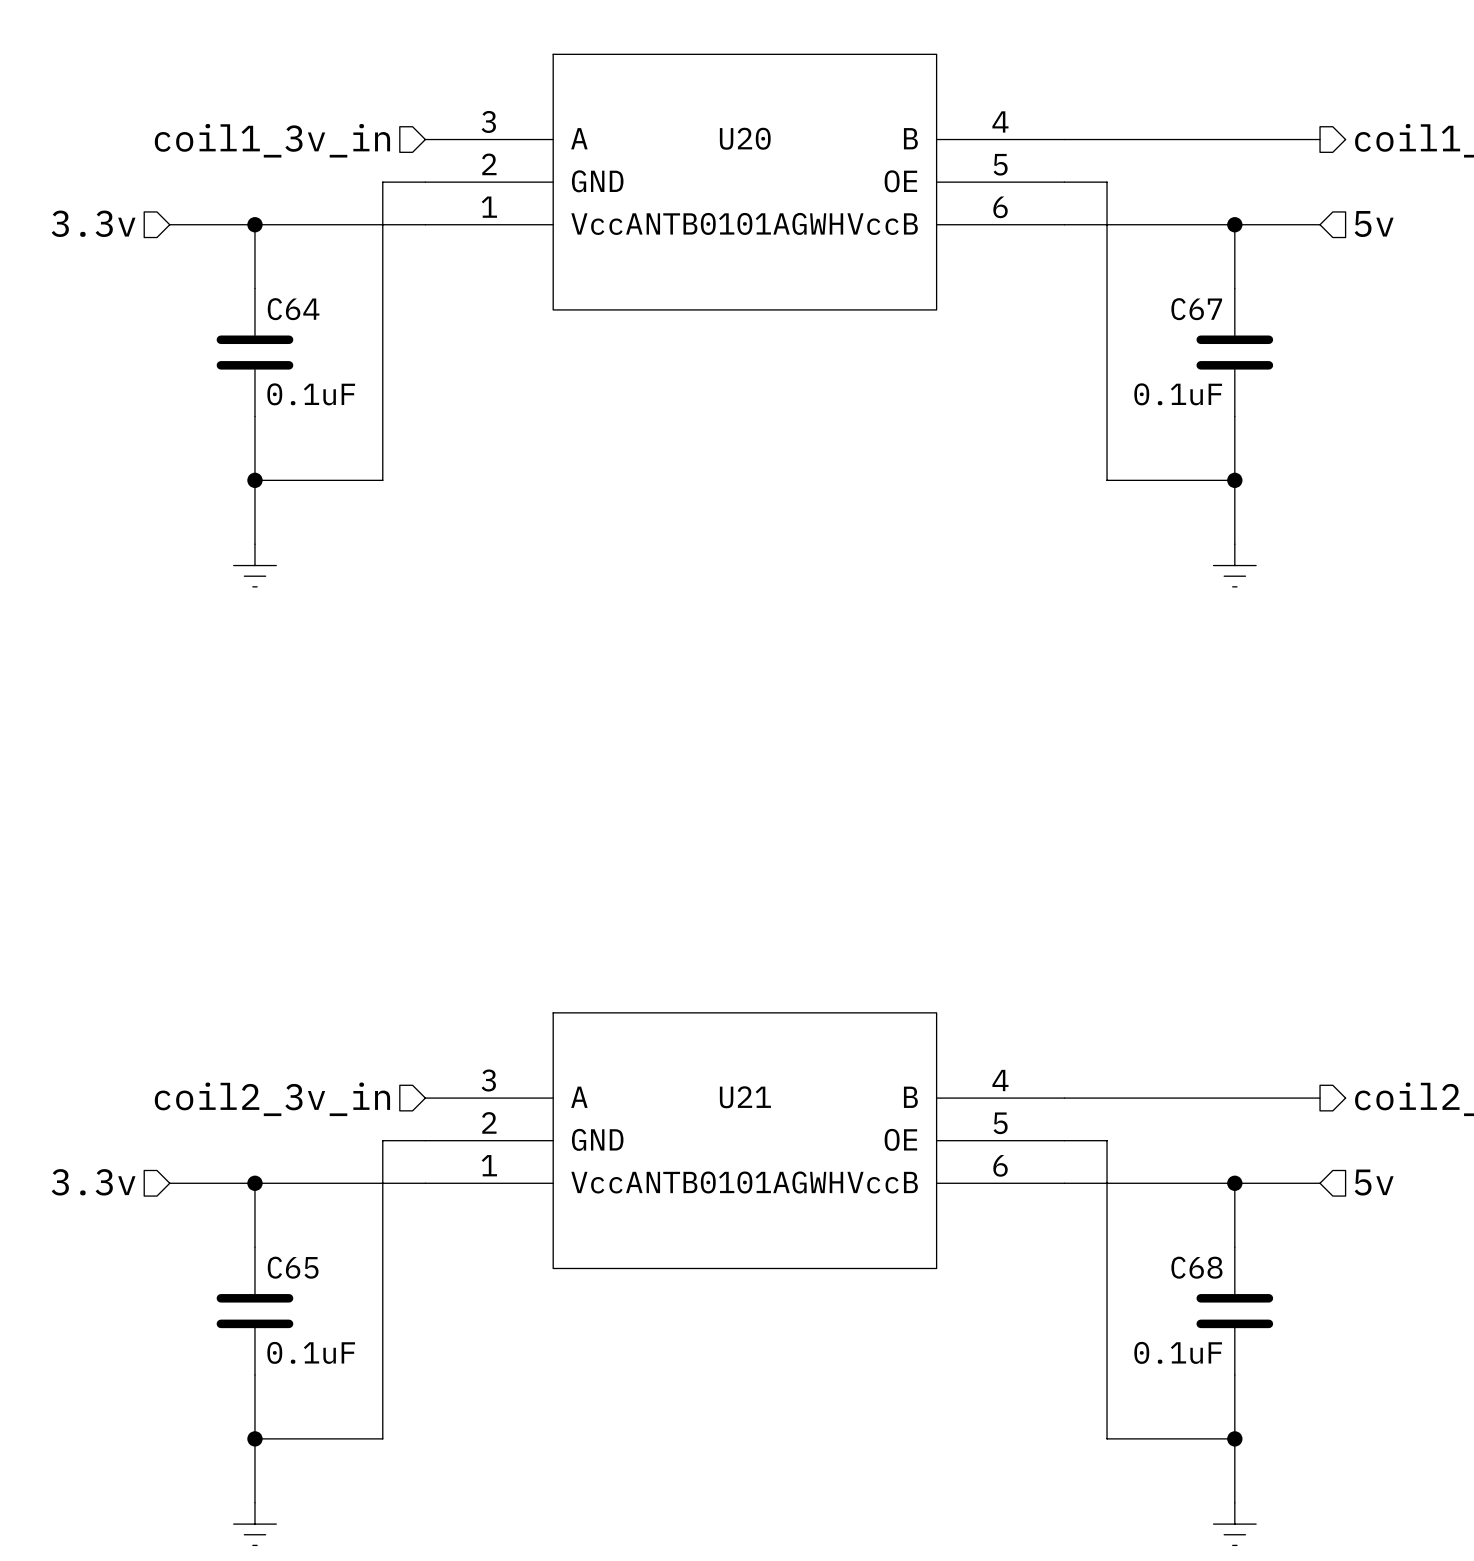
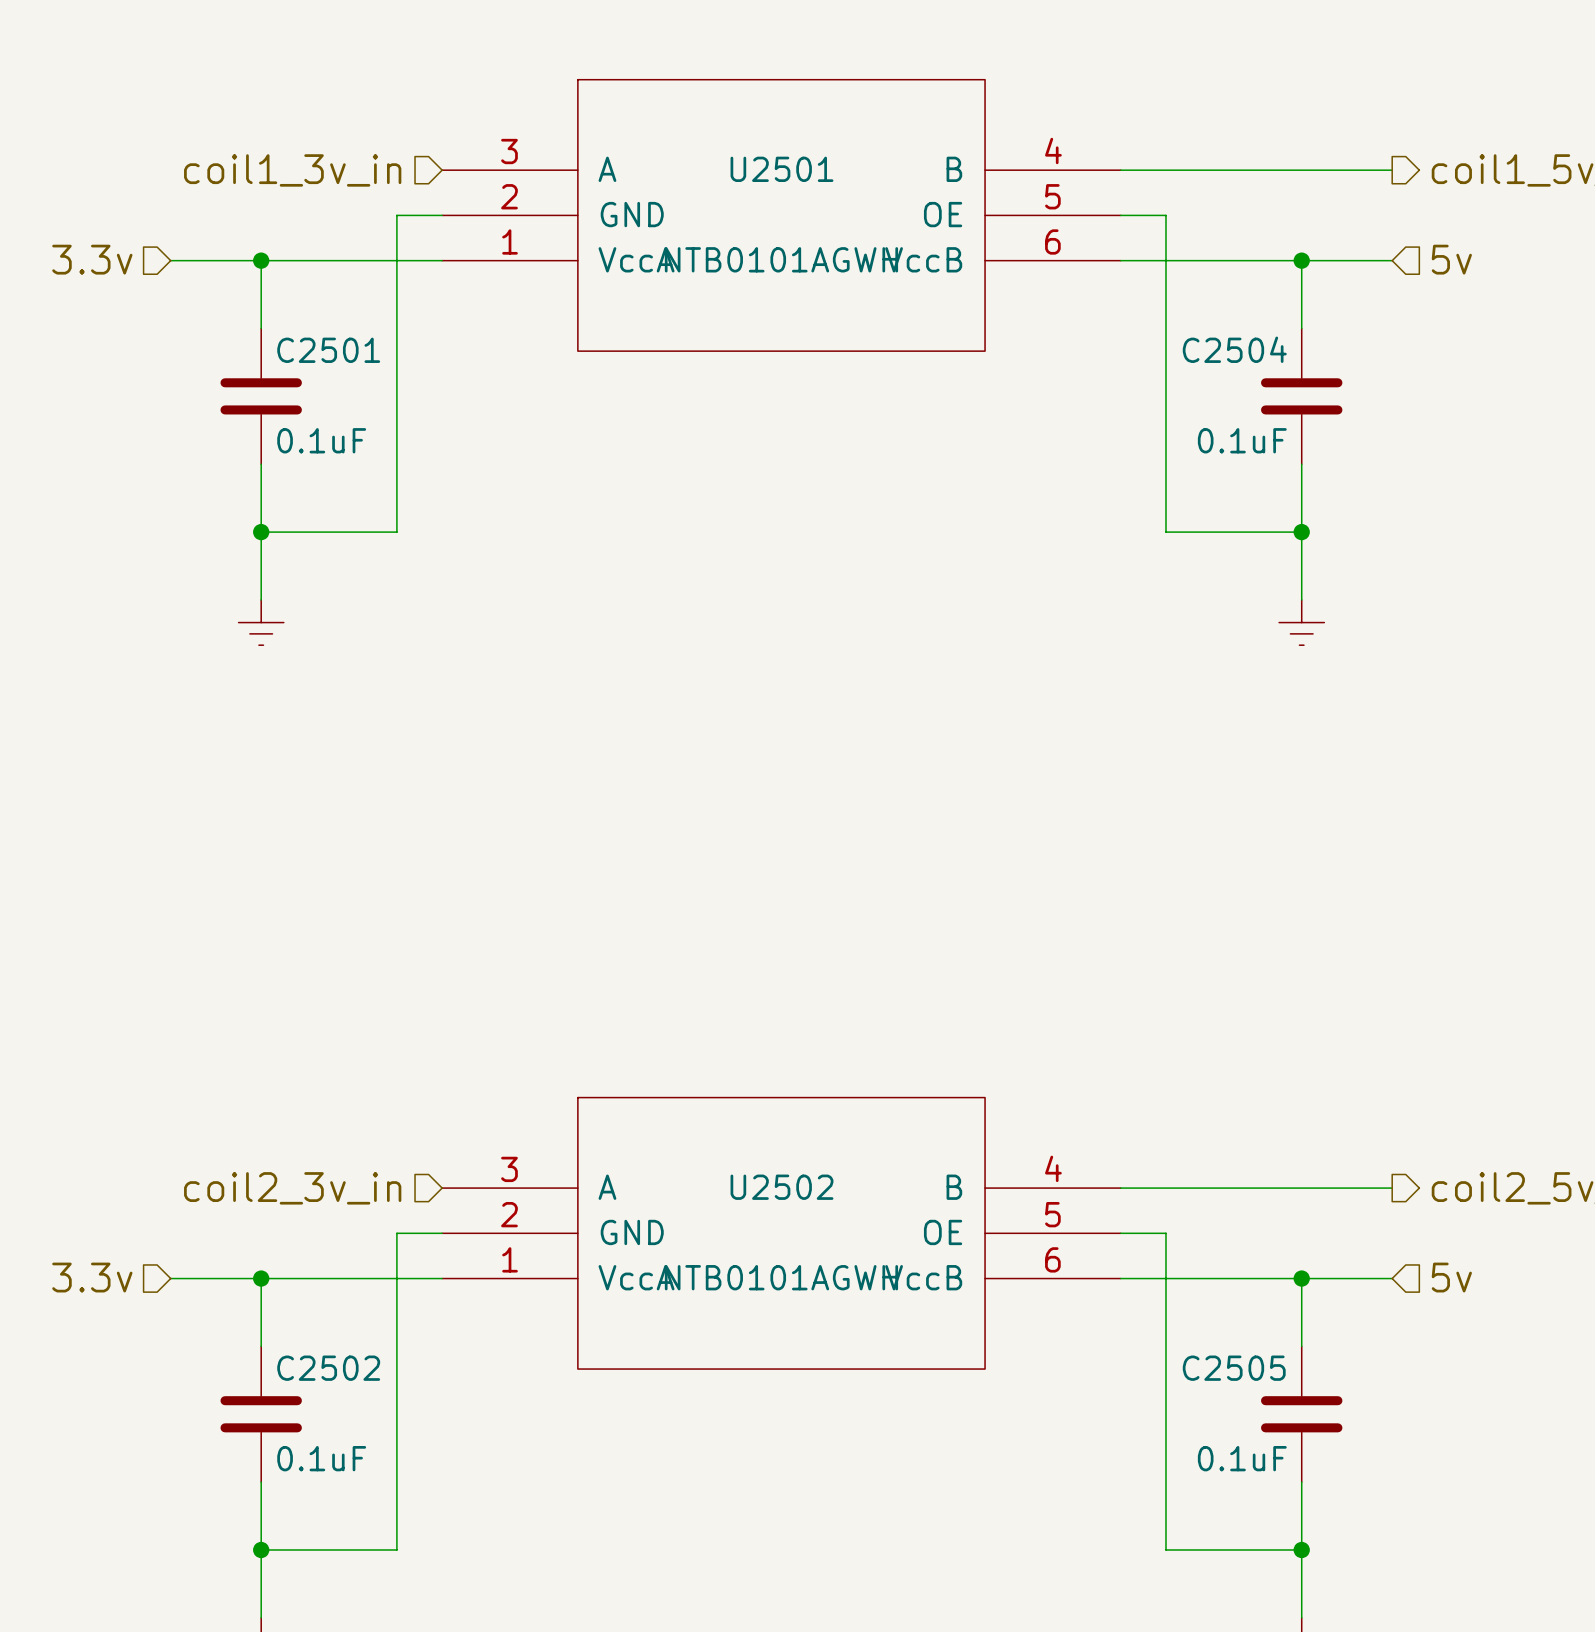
U20 name: U20 (745, 138) -> U2501 (781, 169)
C64 name: C64 (293, 309) -> C2501 (328, 350)
C67 name: C67 (1196, 309) -> C2504 (1234, 349)
U21 name: U21 (745, 1097) -> U2502 (781, 1187)
C65 name: C65 (293, 1267) -> C2502 (328, 1368)
C68 name: C68 (1196, 1267) -> C2505 (1234, 1368)

